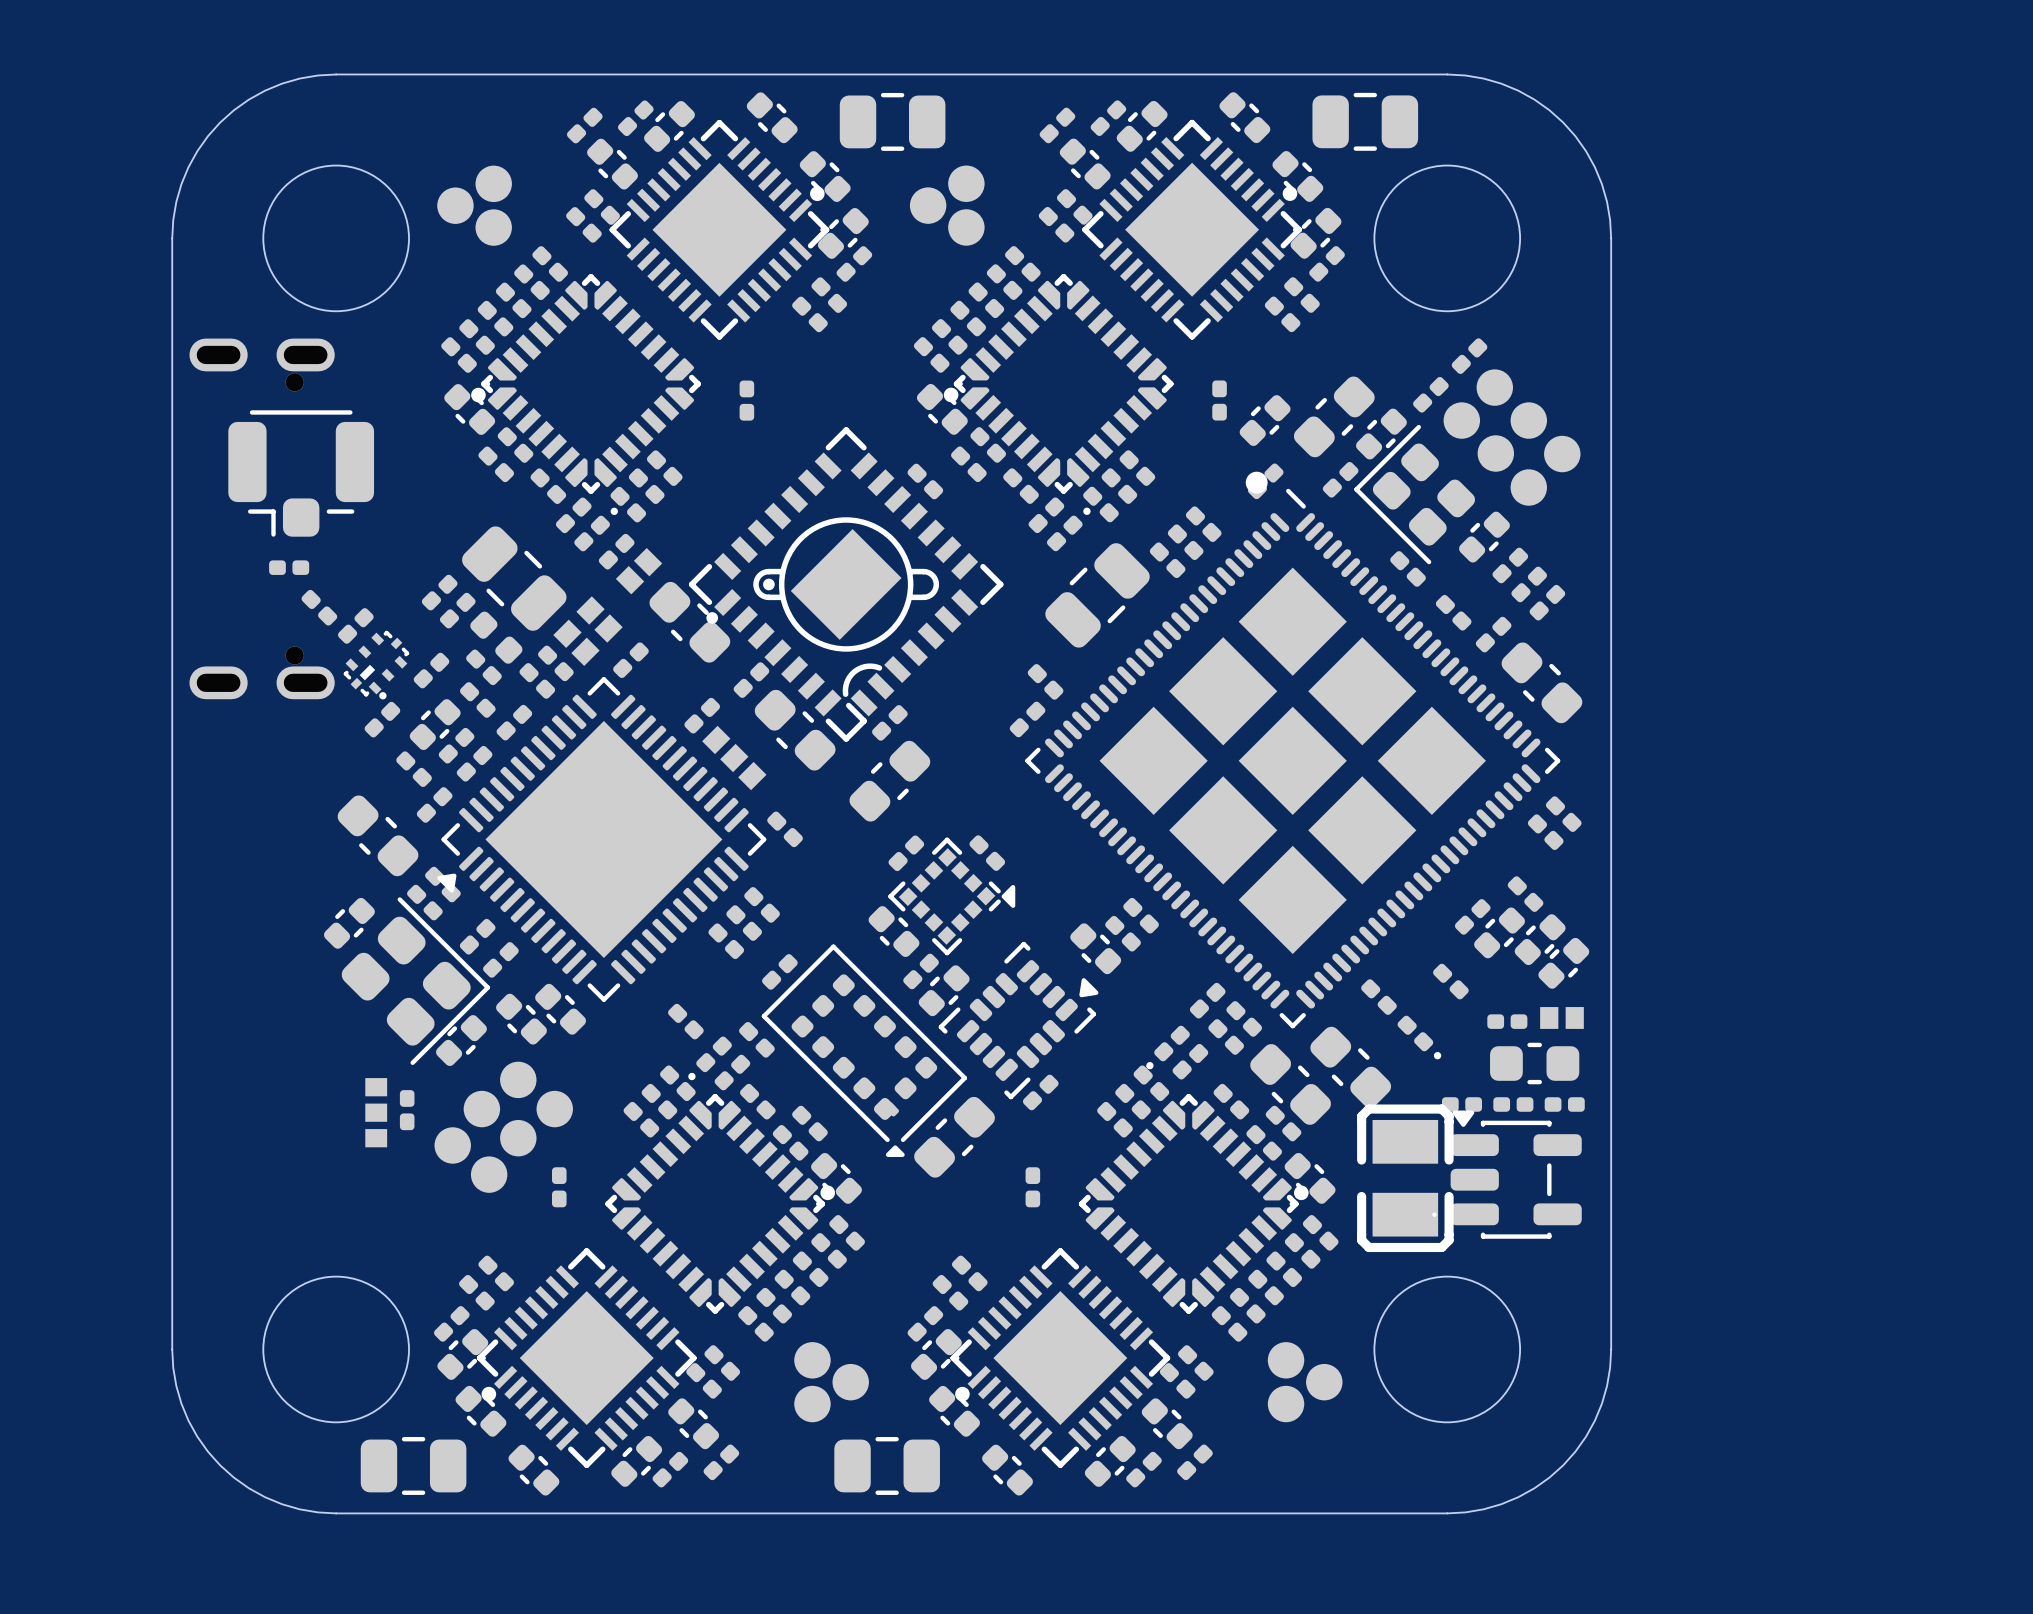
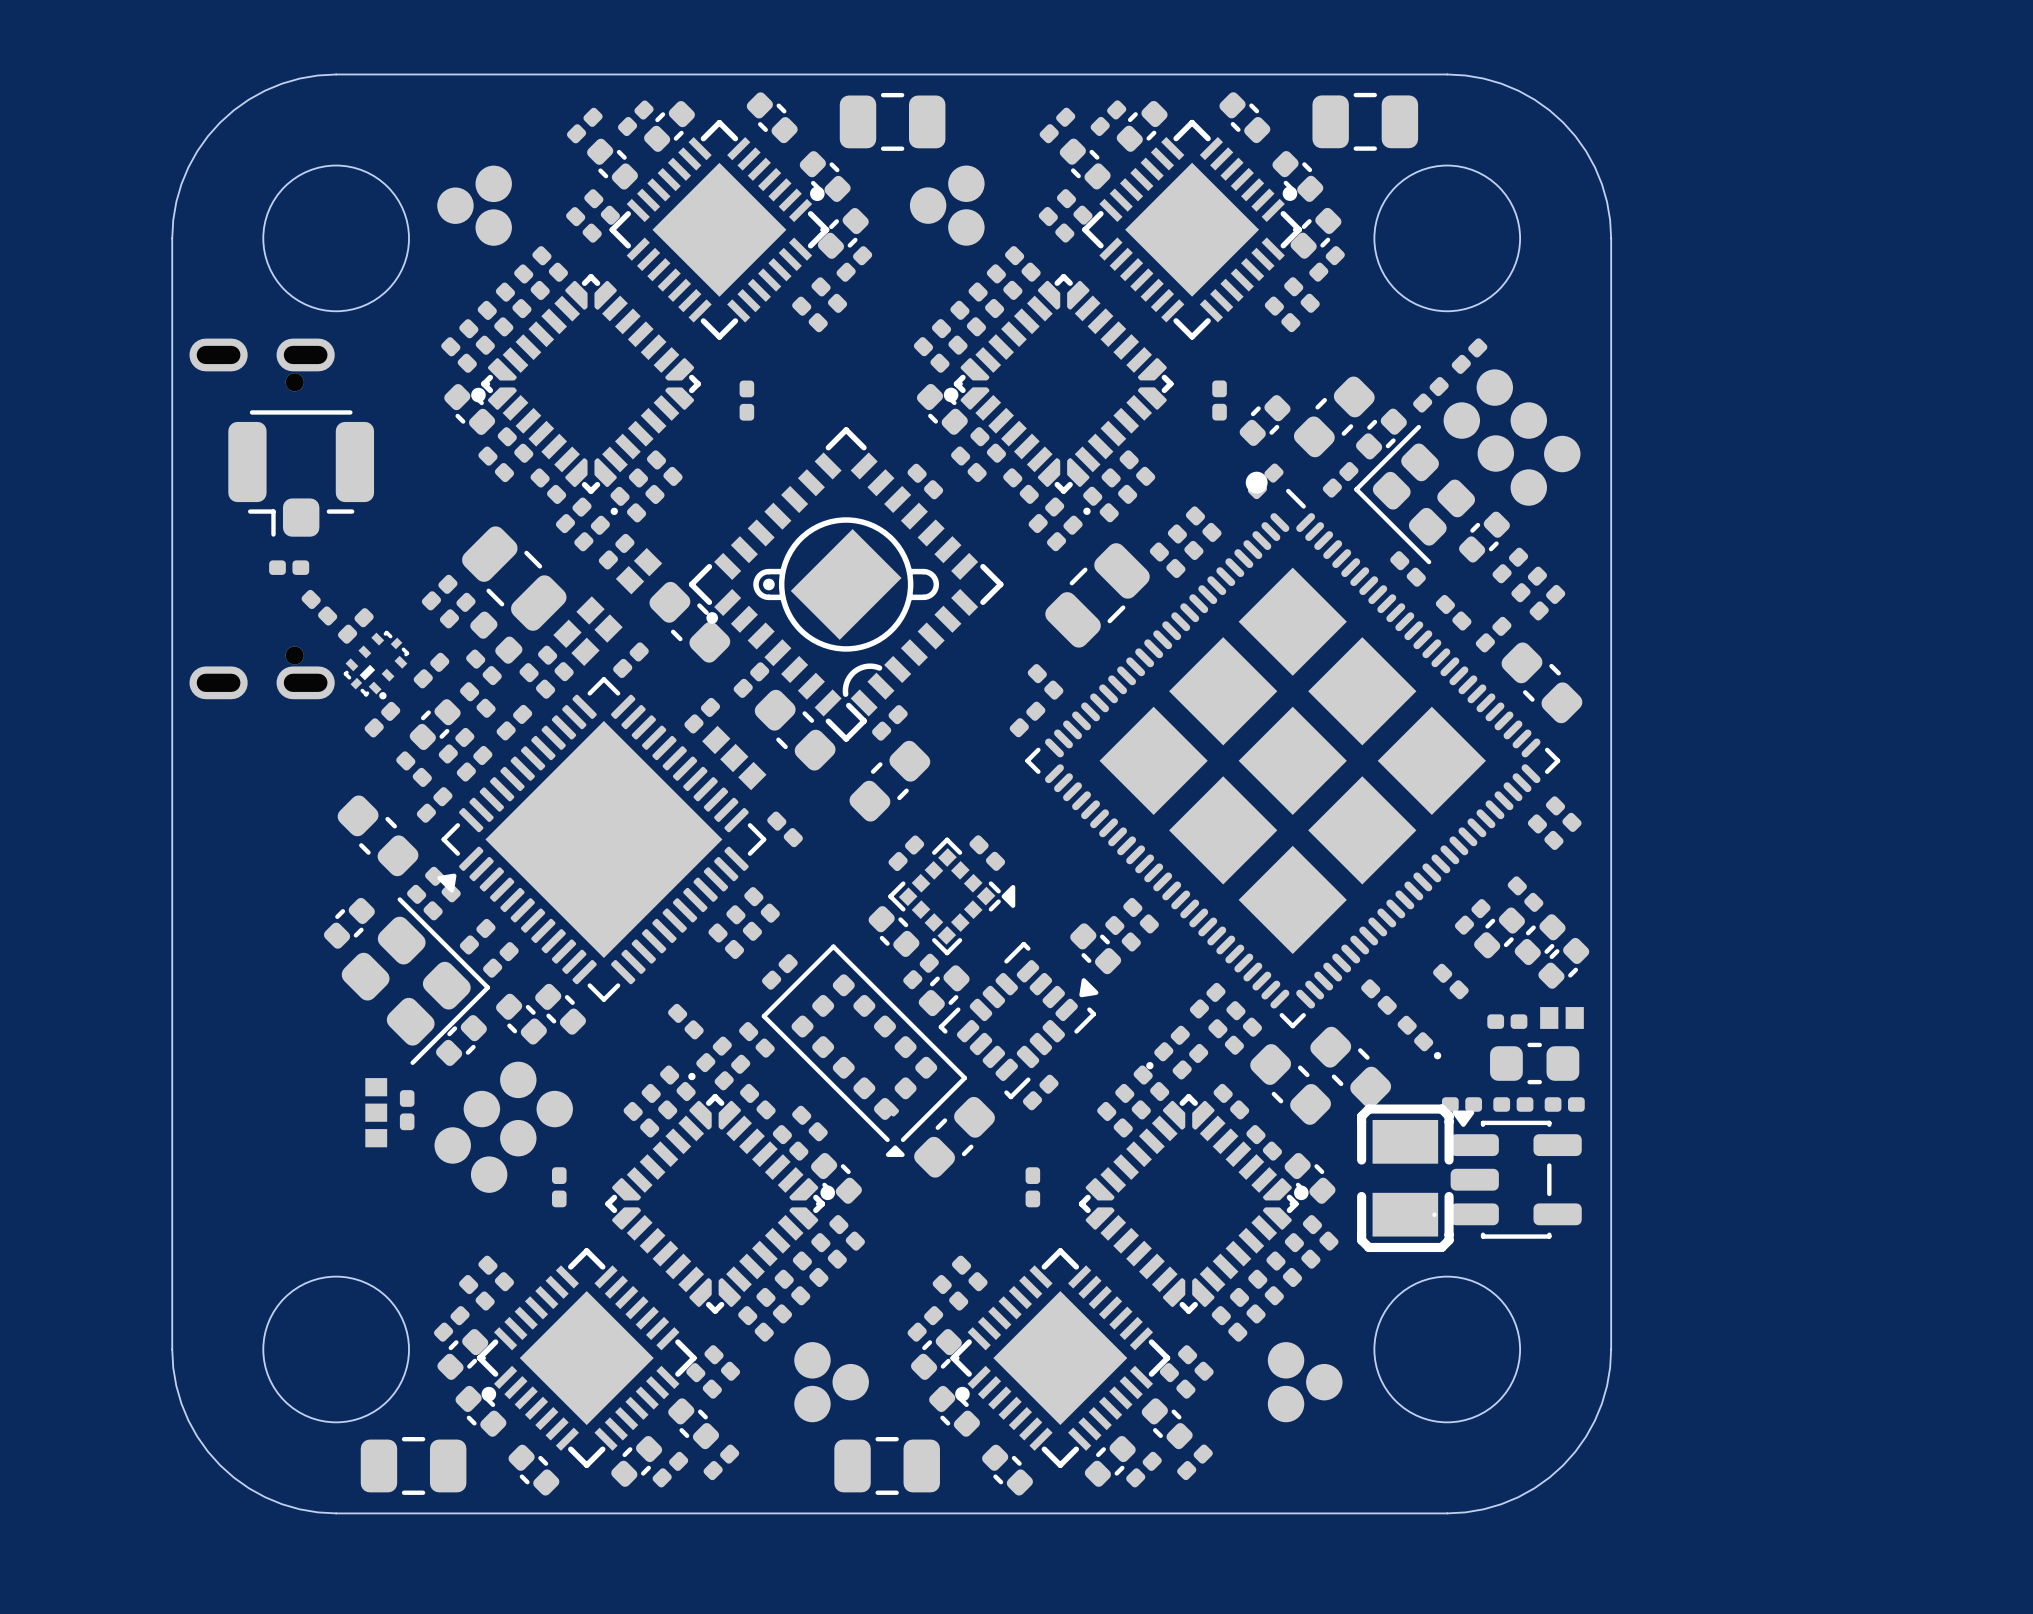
part: (1283, 1123) -> none

